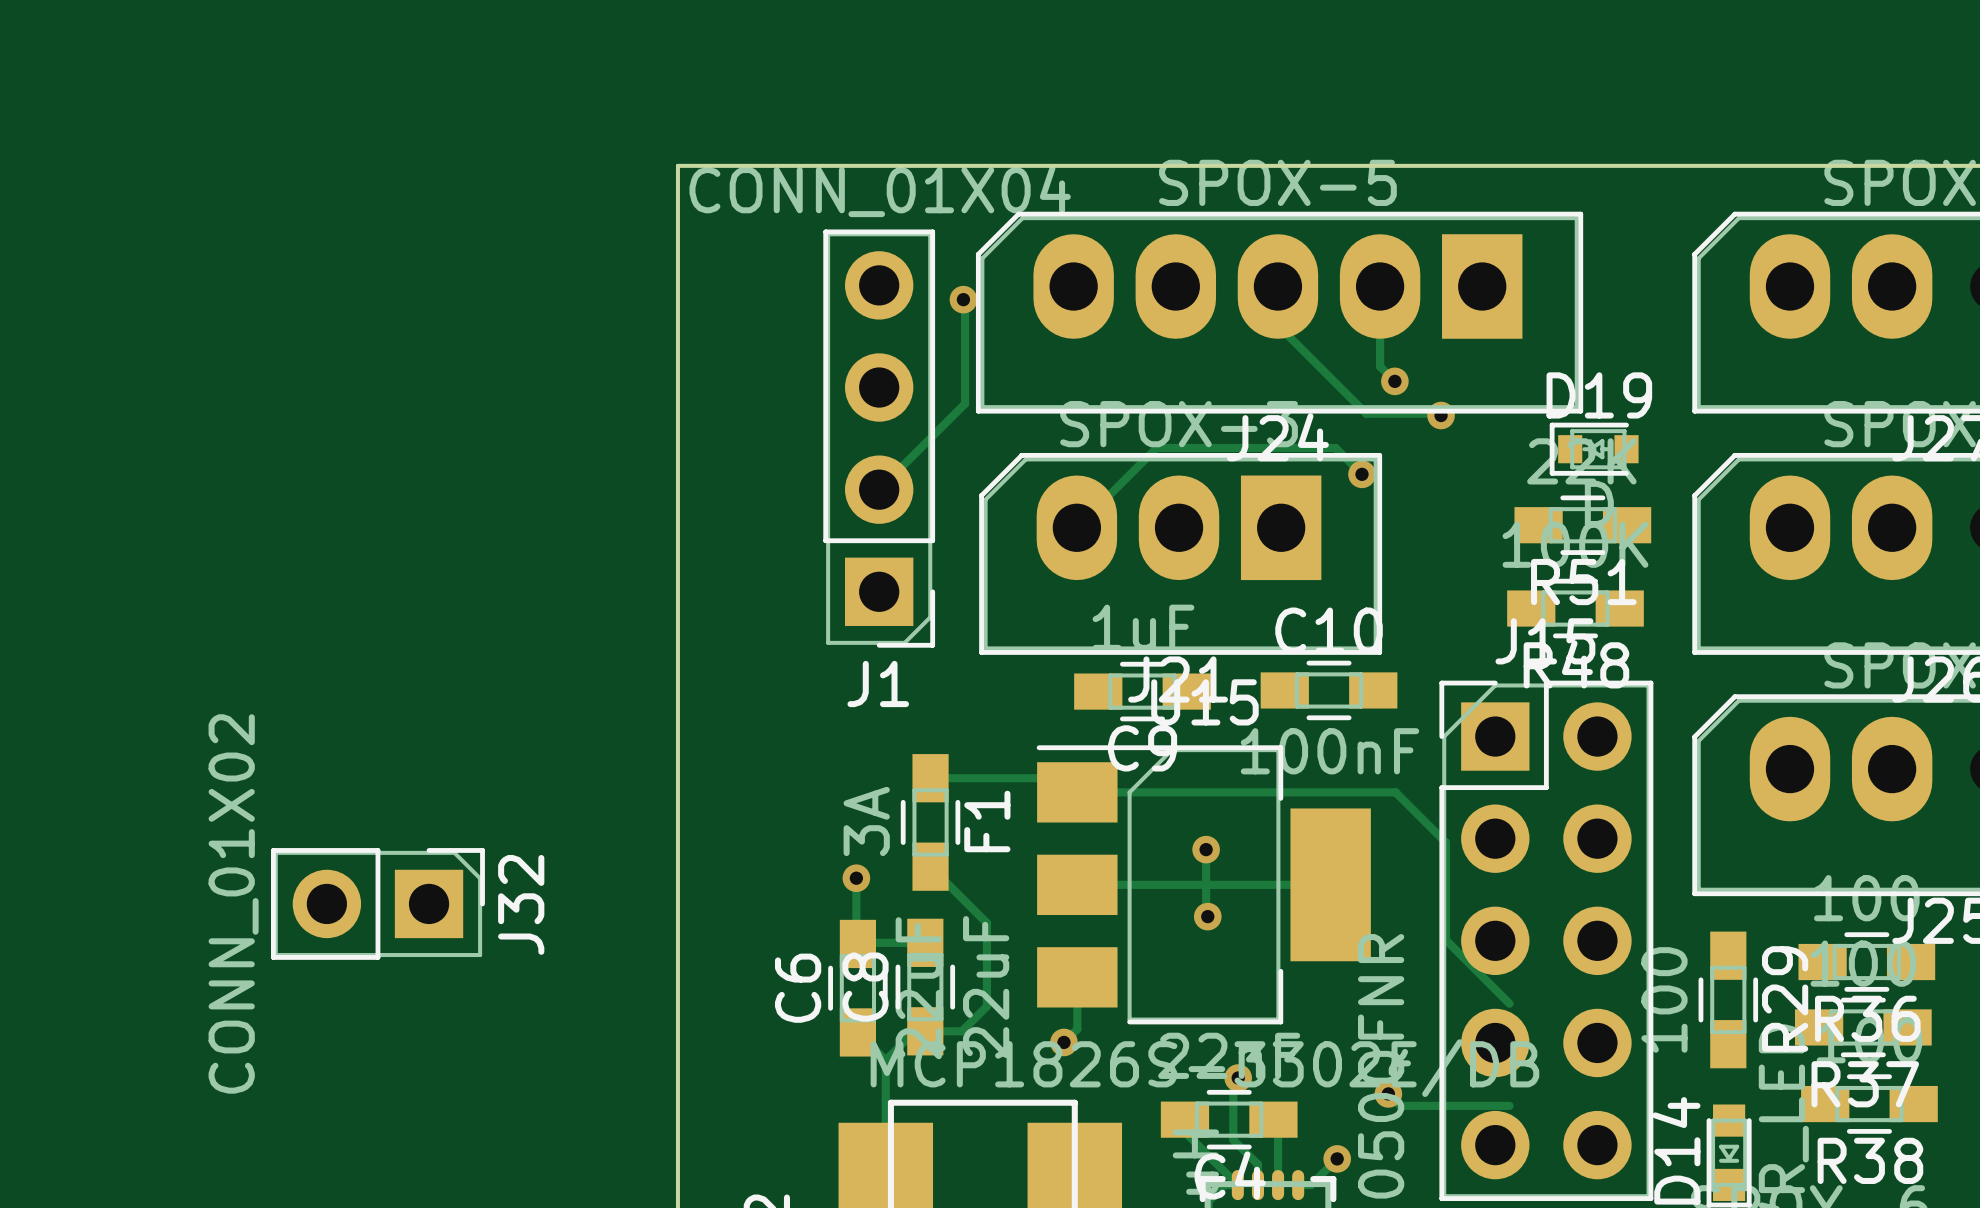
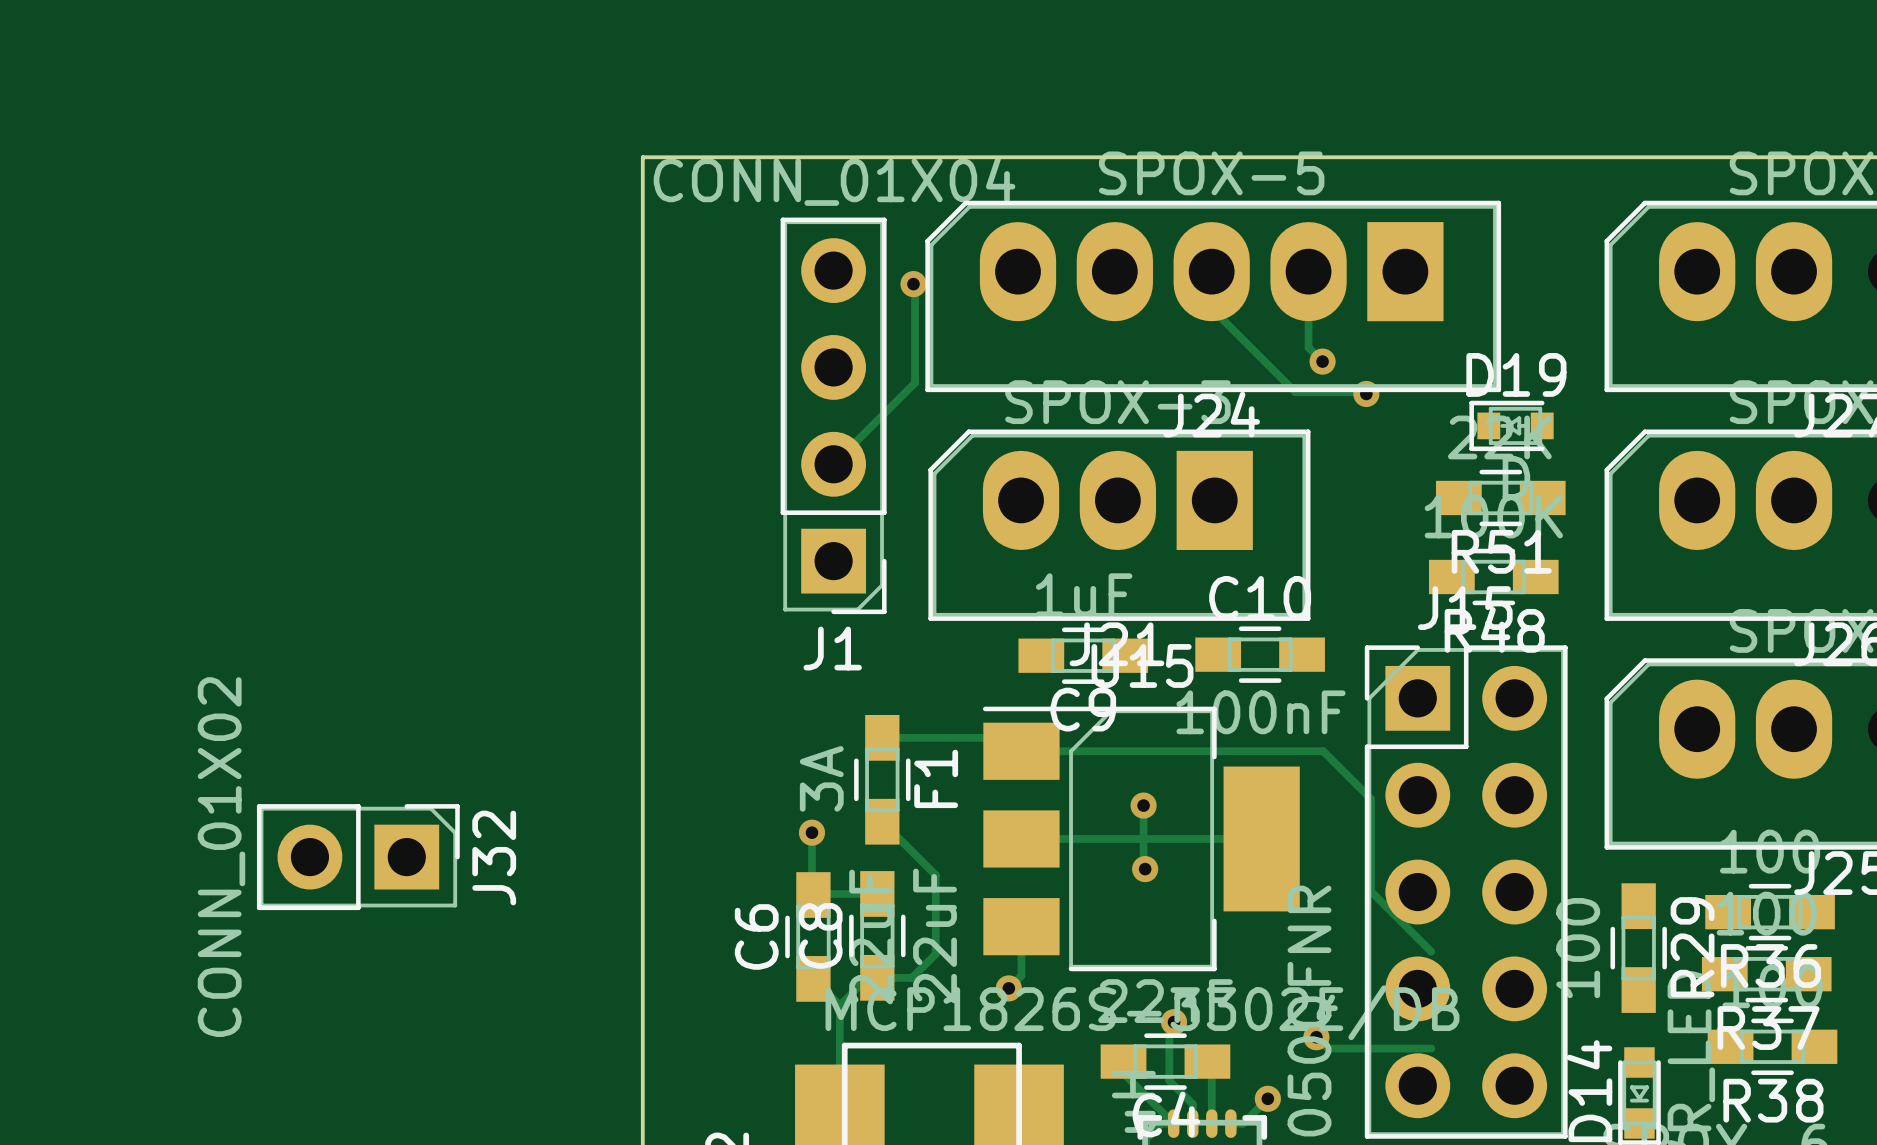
track: (1361, 474) (1335, 448) (1156, 448) (1076, 527) -> none
via: (1361, 474) -> none

